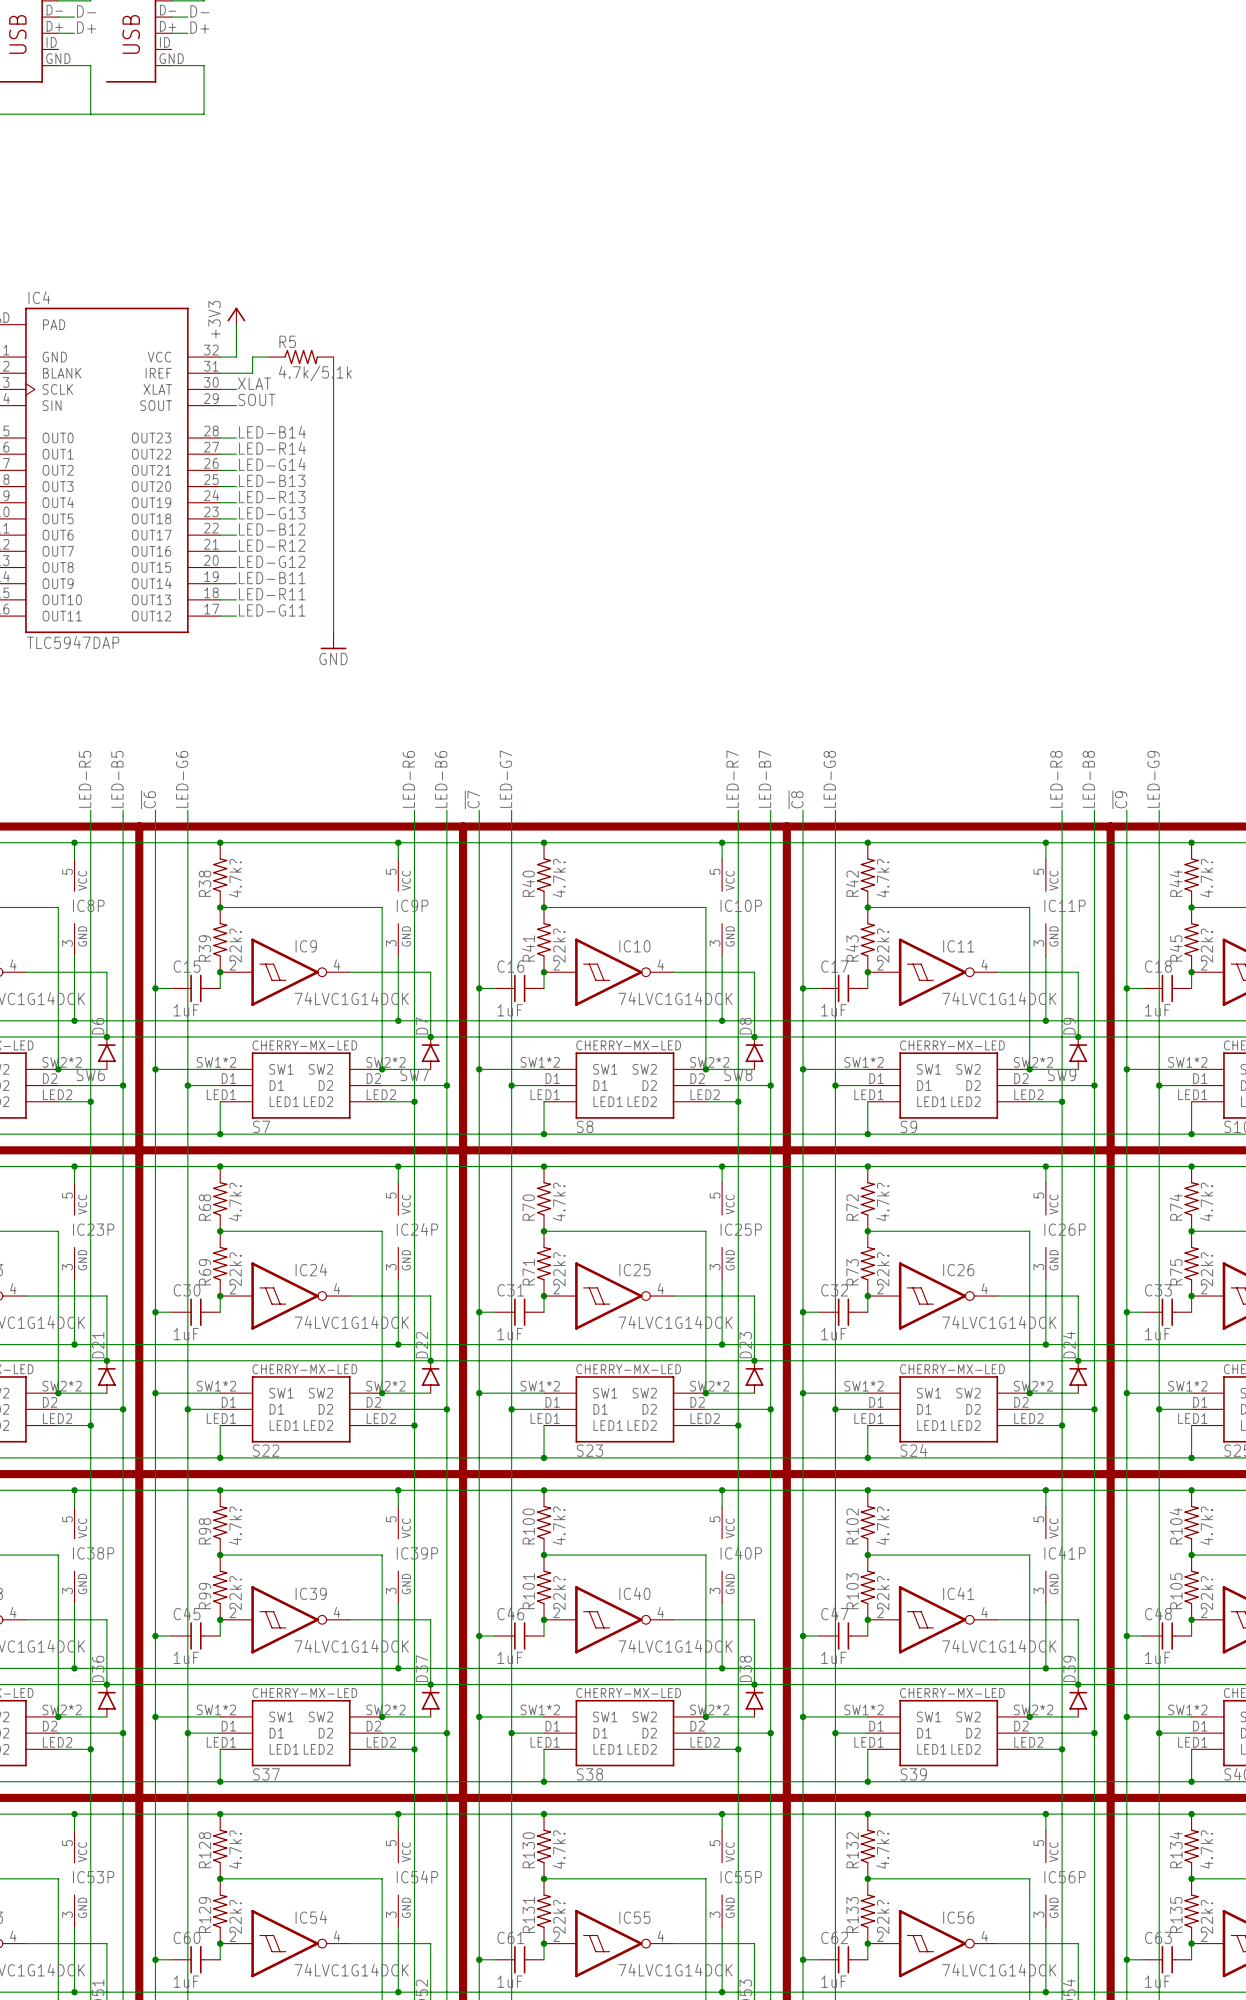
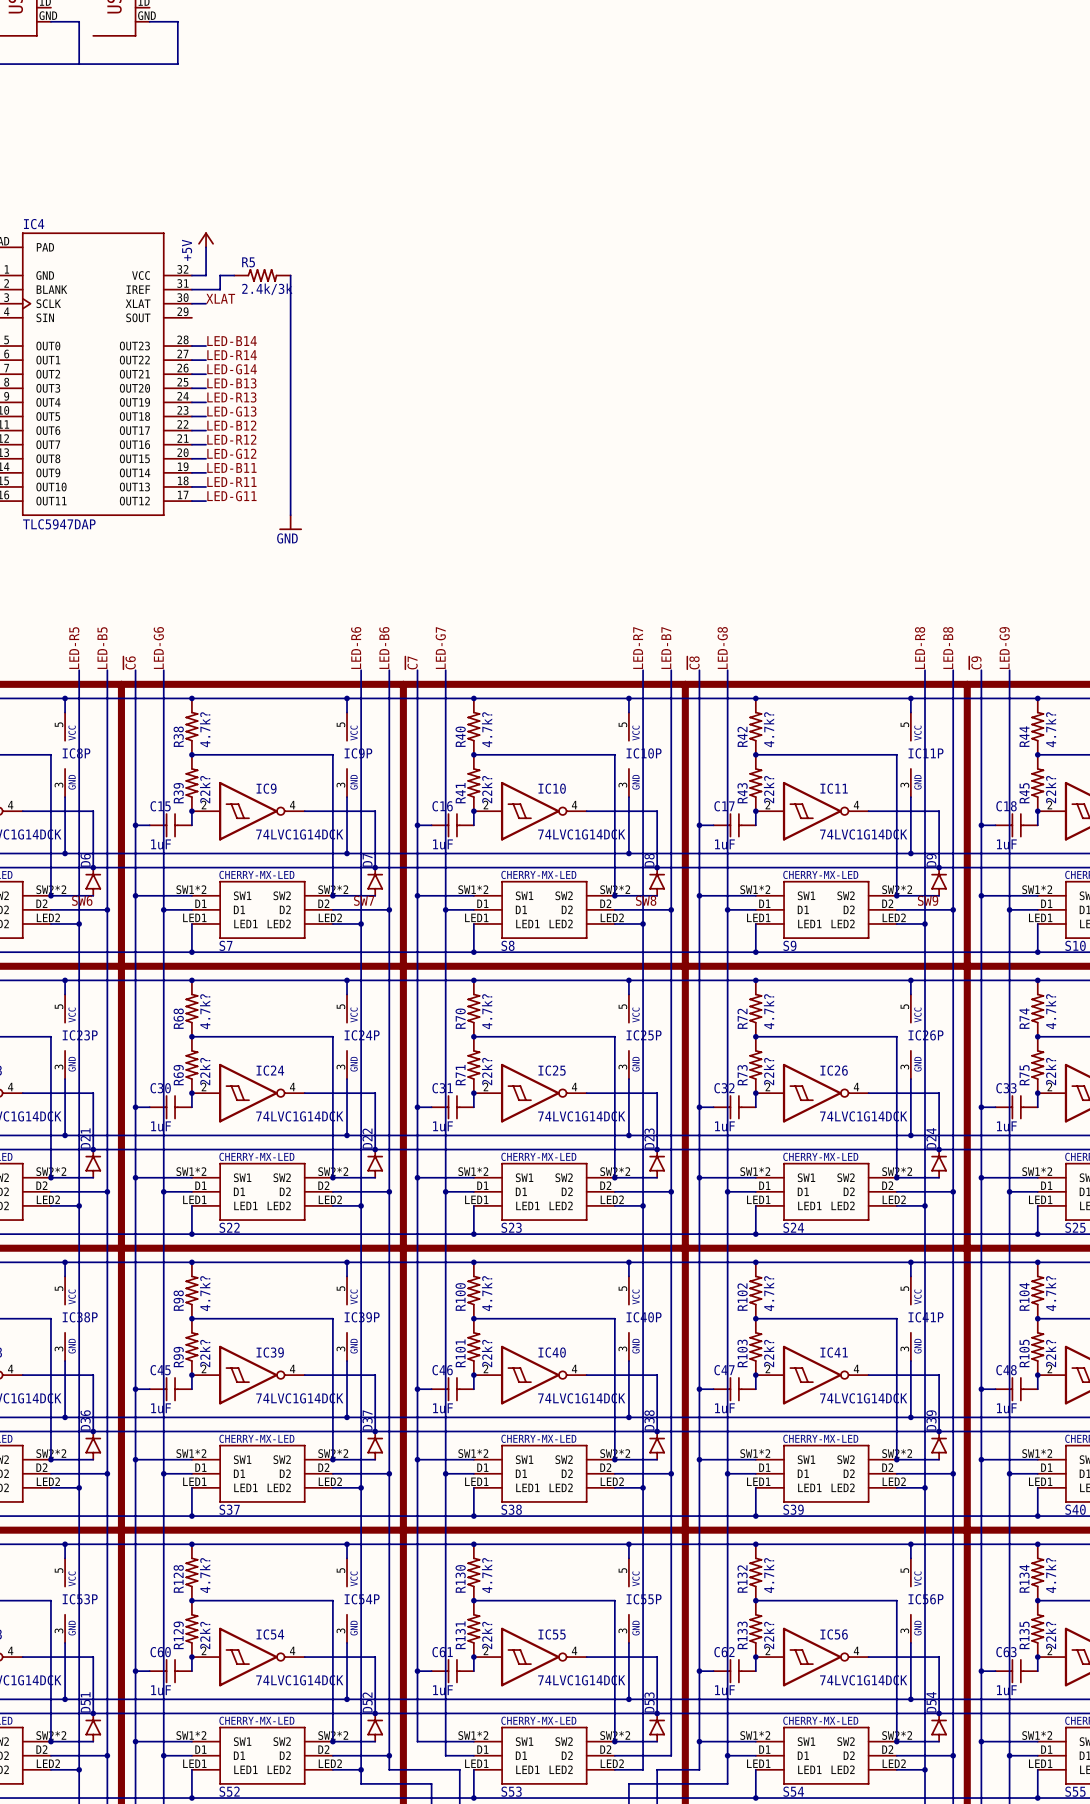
power symbol: +3V3 (236, 316) -> +5V (206, 239)
R5 value: 4.7k/5.1k (315, 373) -> 2.4k/3k (267, 289)
label: SOUT (256, 399) -> none
wire: (220, 405) (236, 405) -> none

